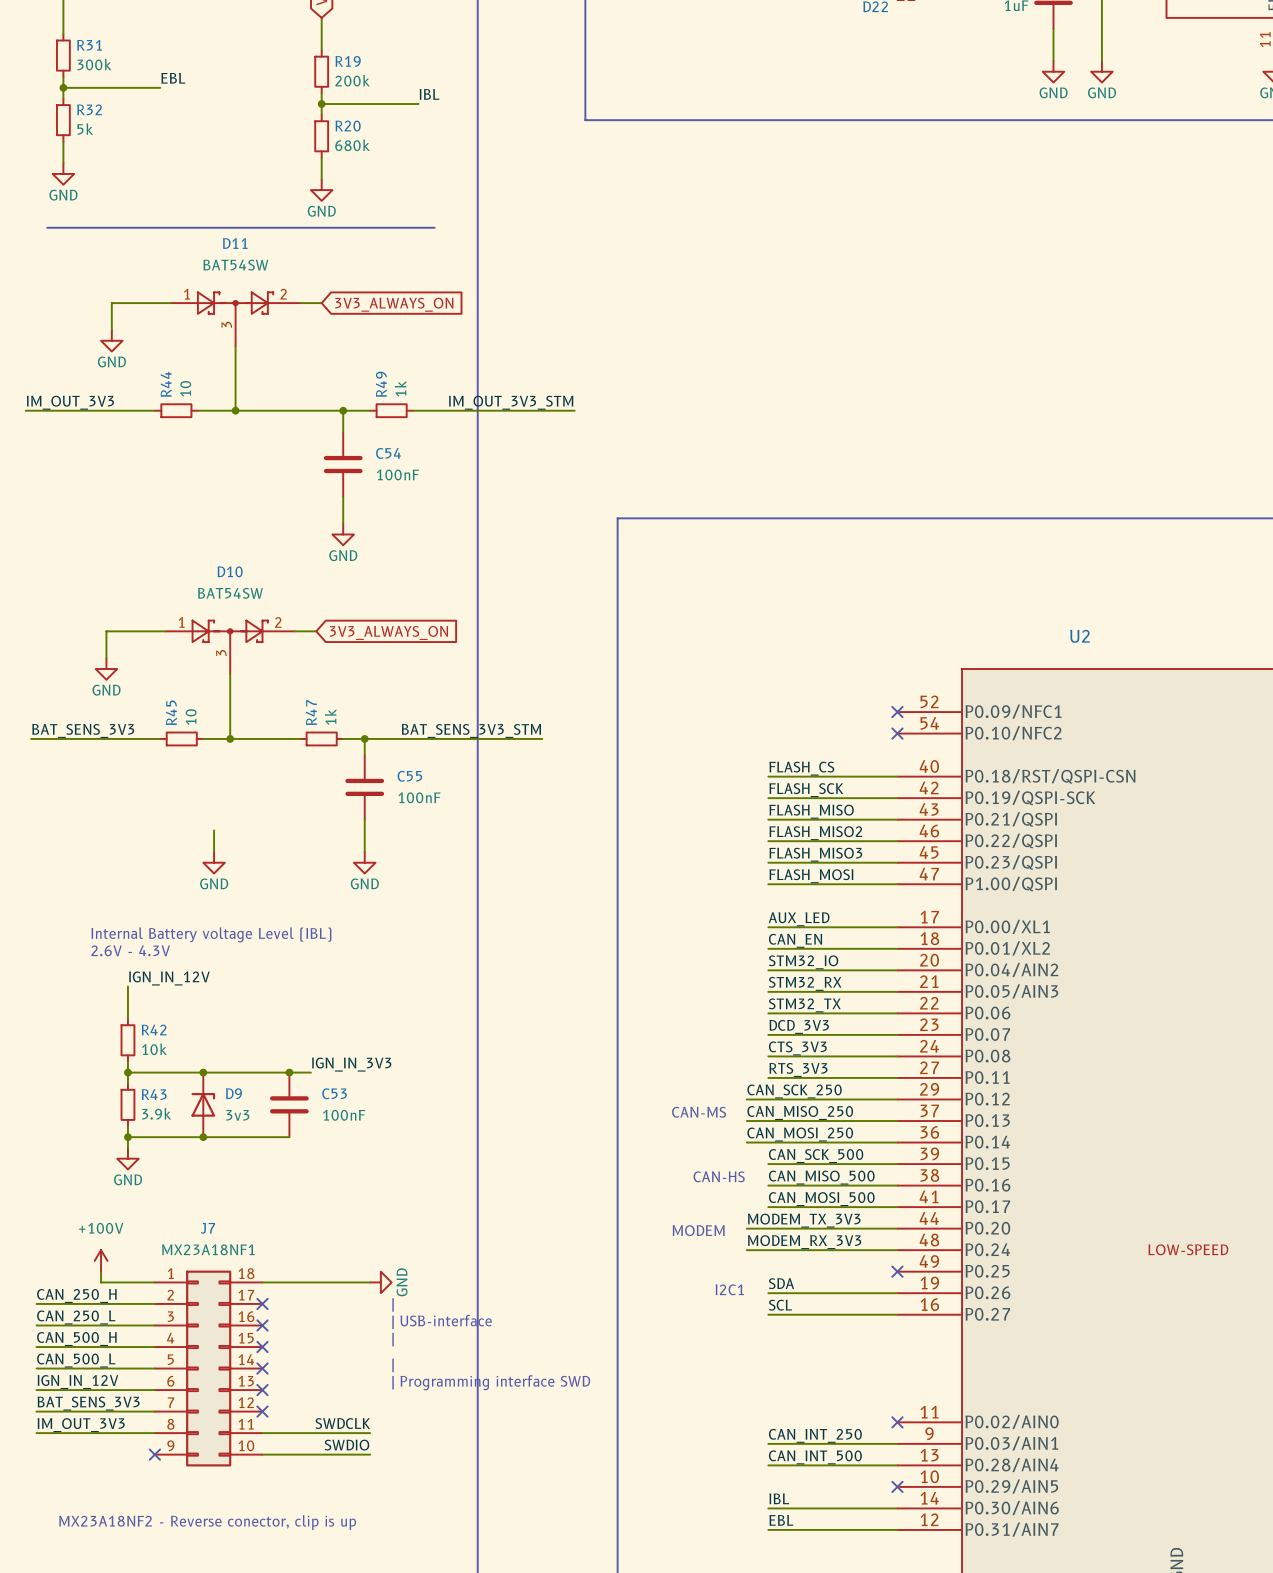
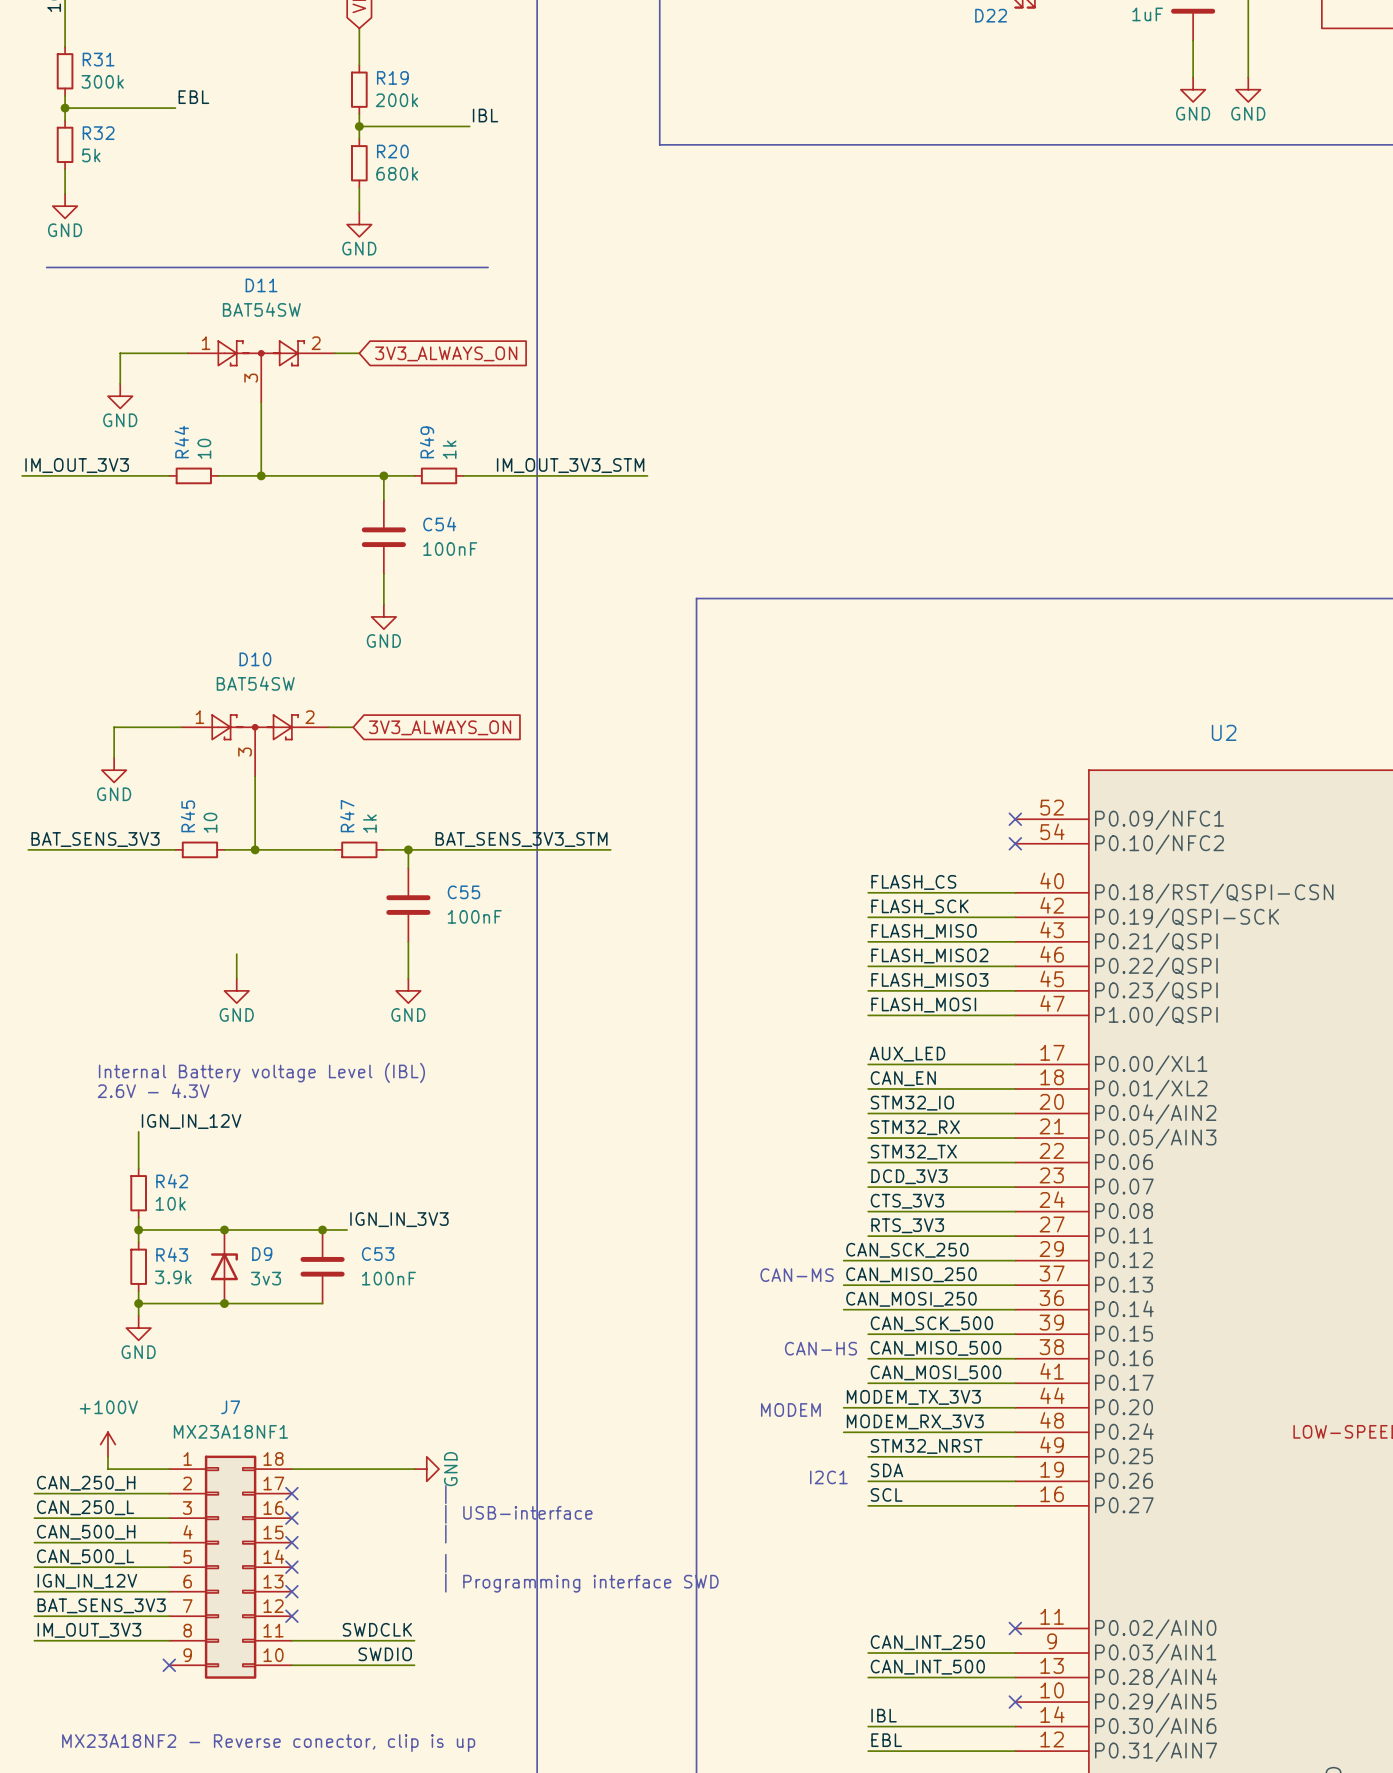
label: none -> STM32_NRST (926, 1446)
wire: none -> (868, 1456) (1015, 1456)
no-connect mark: (897, 1271) -> none

